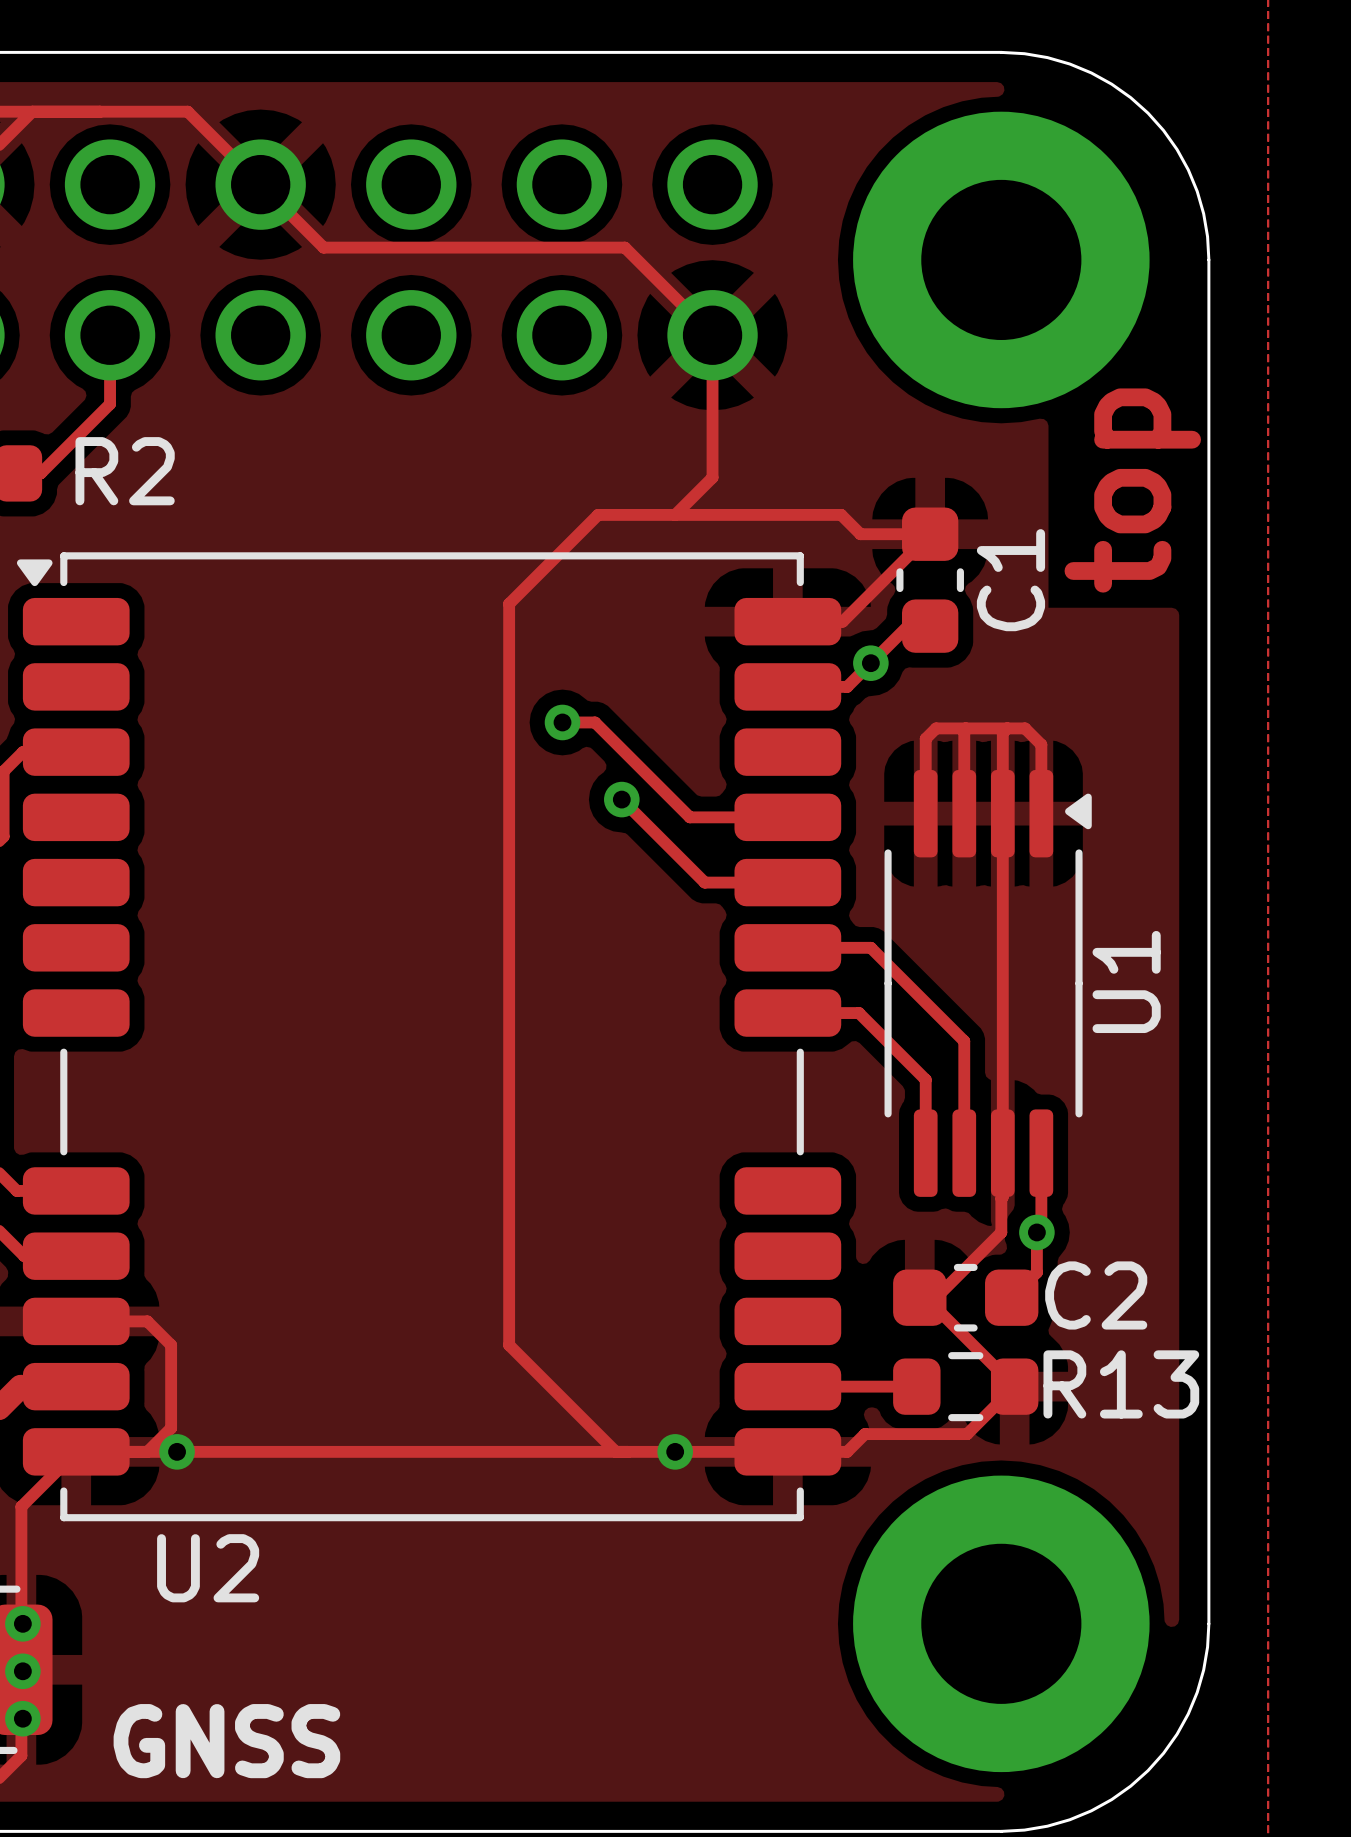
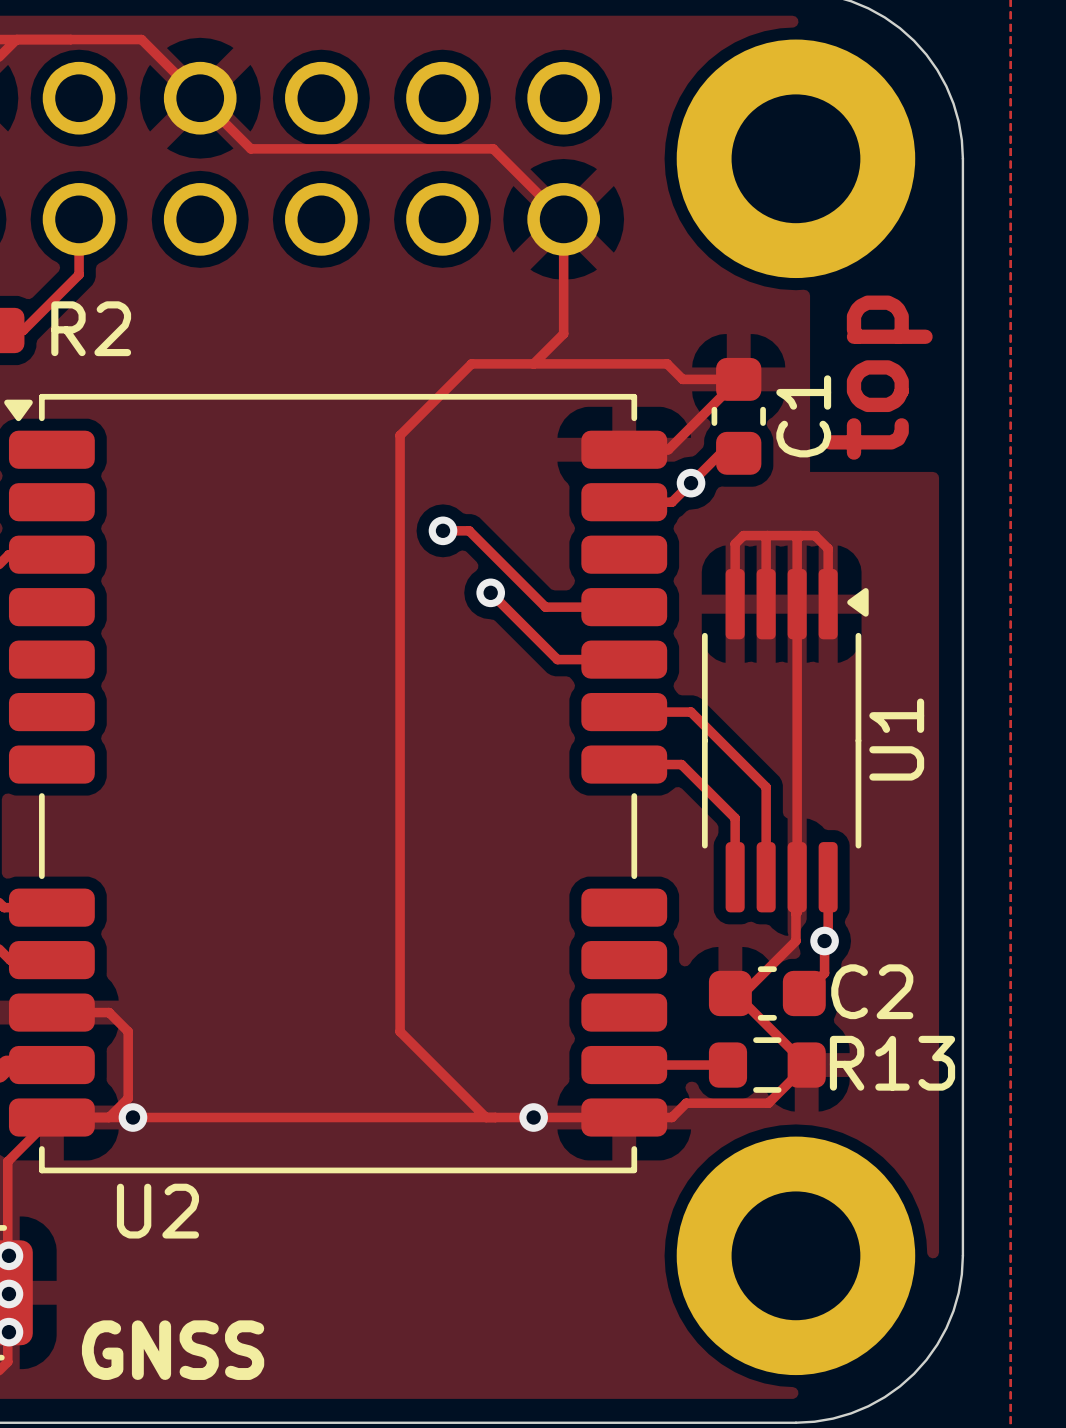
text position: top (1132, 490) -> top (877, 377)

